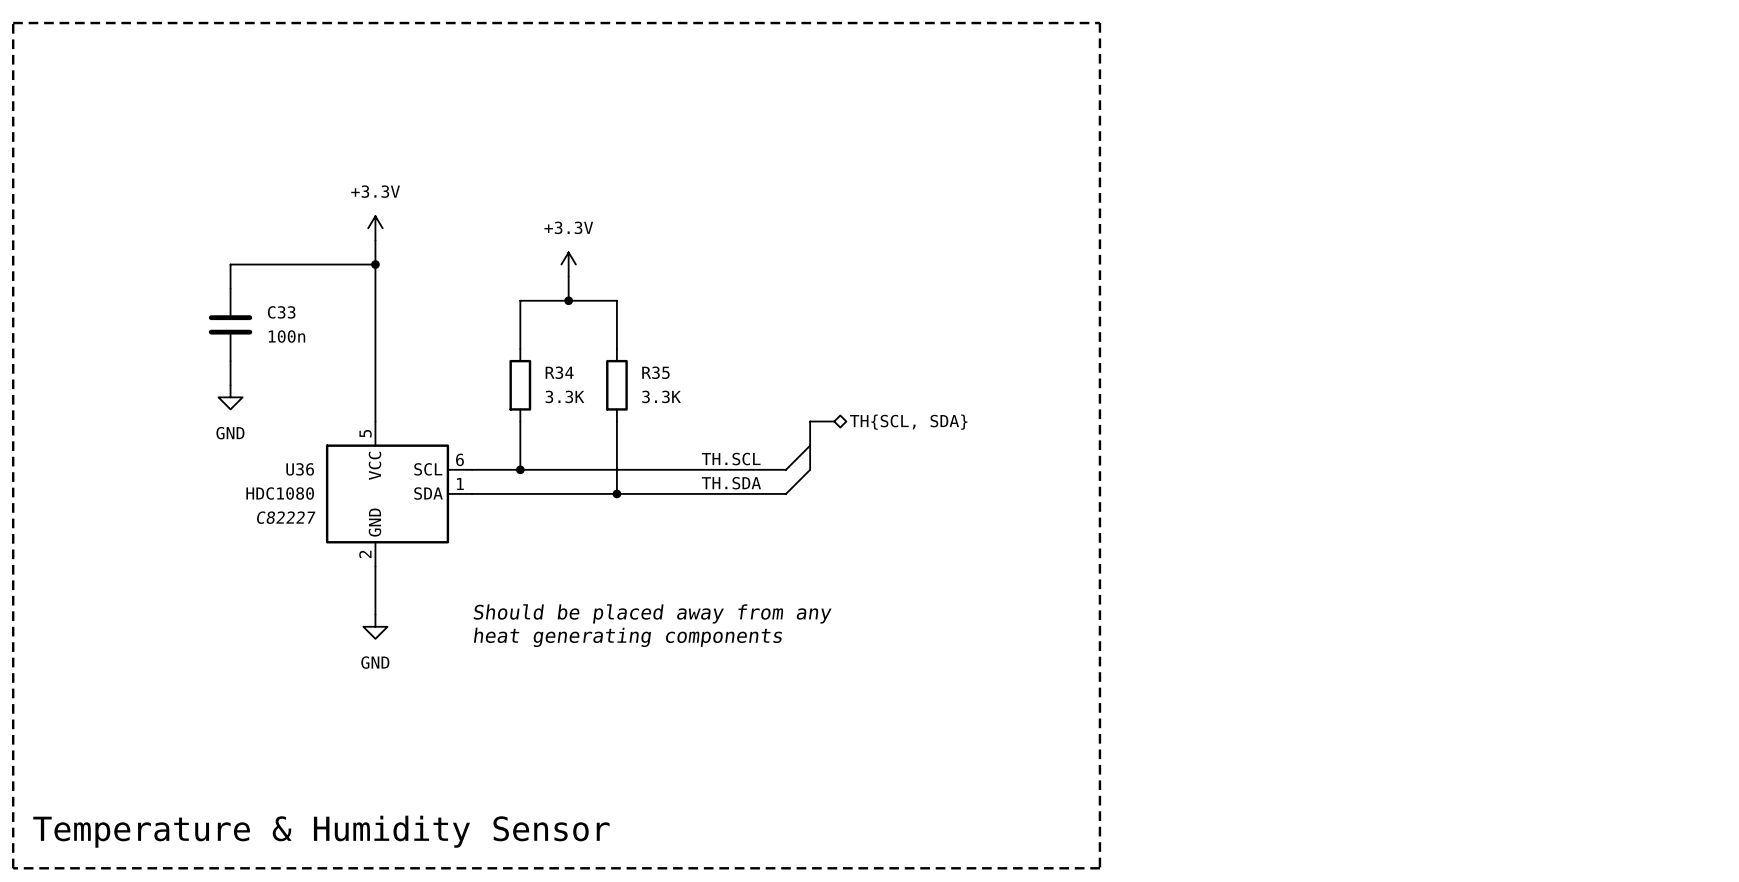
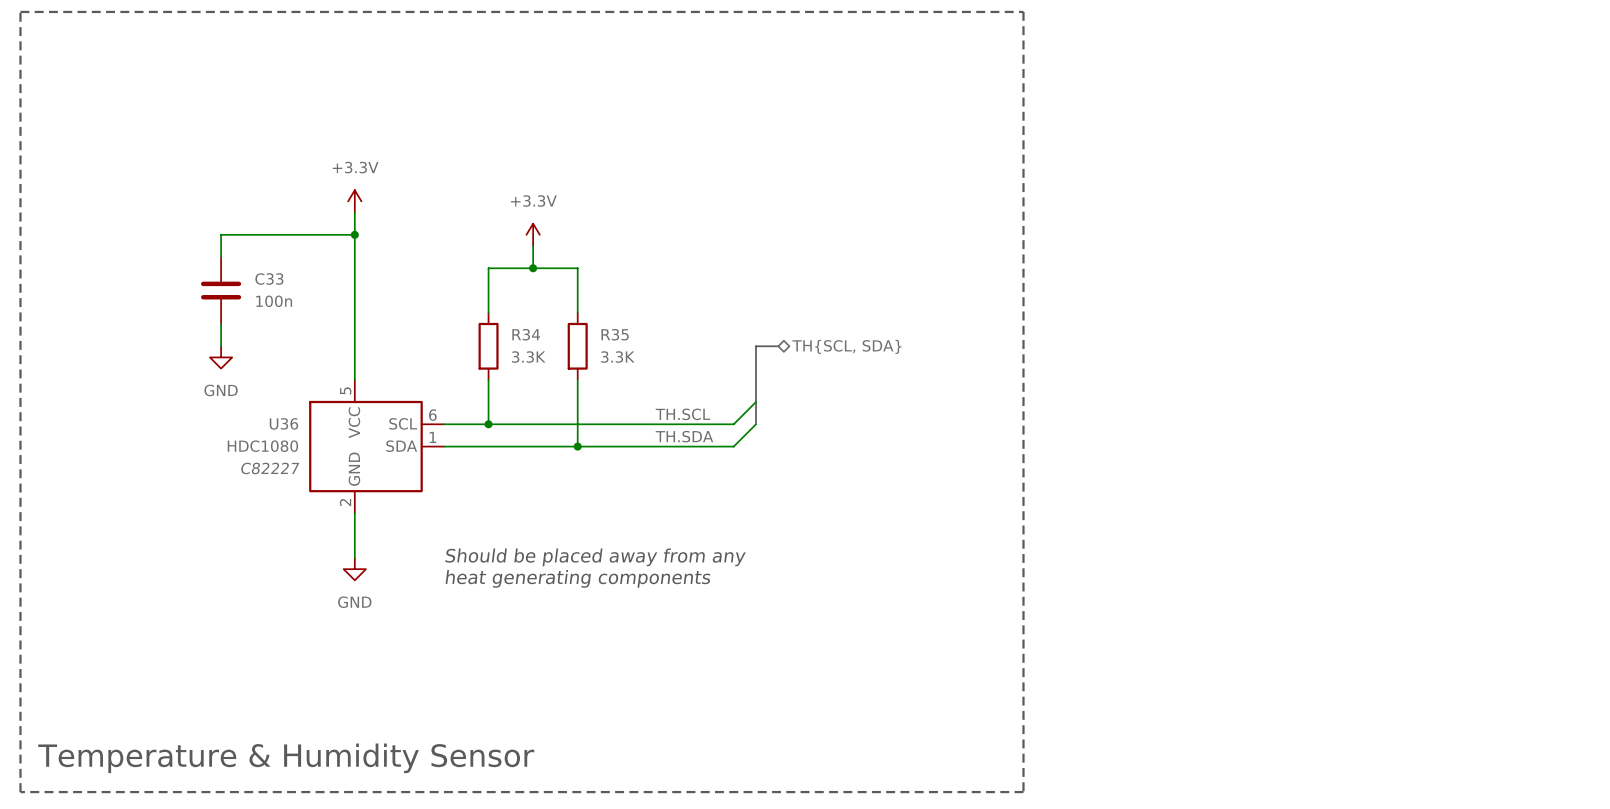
bus: (810, 421) (834, 421) -> (756, 379) (756, 346) (778, 346)
hierarchical label position: TH{SCL, SDA} (908, 422) -> TH{SCL, SDA} (846, 346)

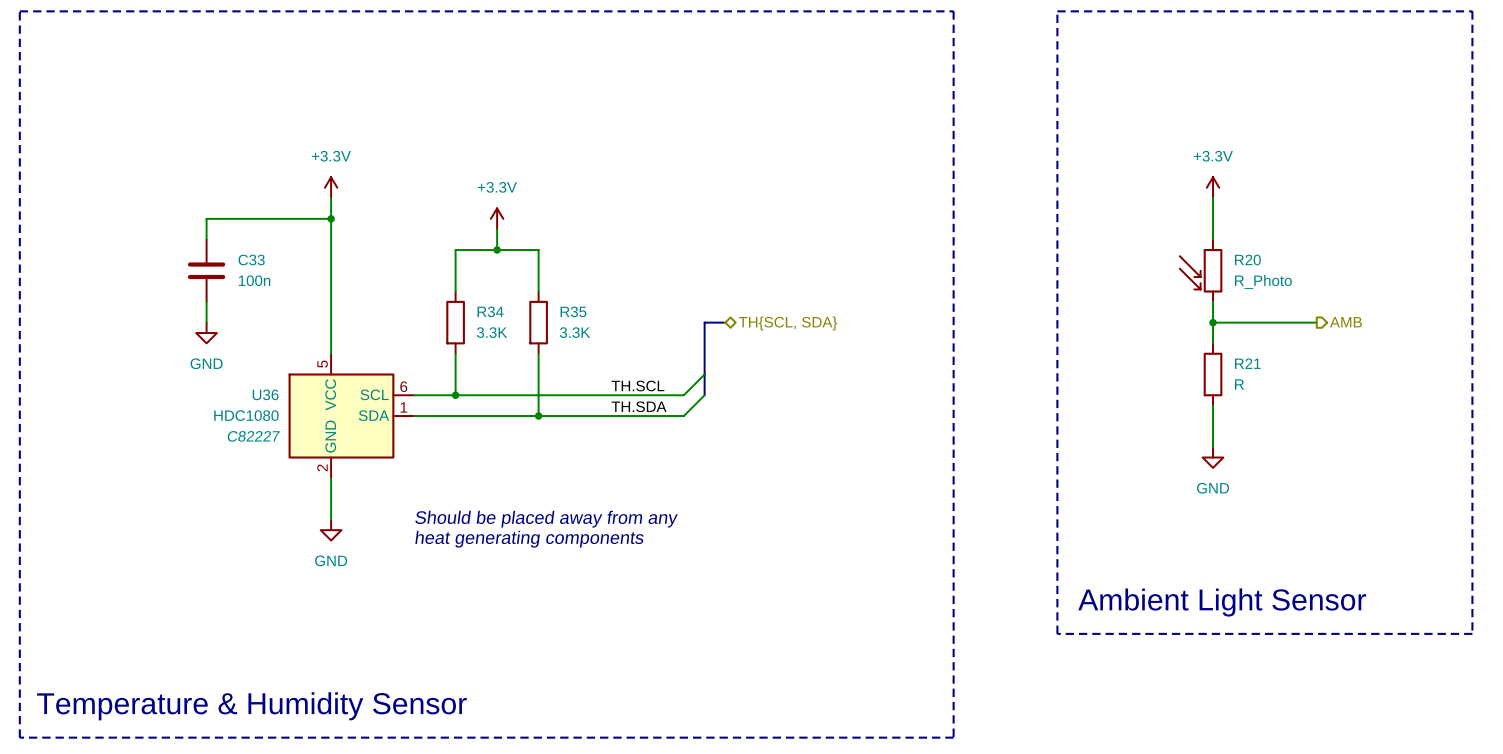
line: none -> (1057, 11) (1472, 11) (1472, 633) (1057, 633) (1057, 11)
power symbol: none -> +3.3V (1213, 187)
wire: none -> (1213, 198) (1213, 239)
R20: none -> R_Photo (1201, 270)
wire: none -> (1213, 301) (1213, 343)
hierarchical label: none -> AMB (1345, 322)
wire: none -> (1213, 322) (1316, 322)
junction: none -> (1213, 322)
R21: none -> R (1213, 374)
wire: none -> (1213, 405) (1213, 447)
power symbol: none -> GND (1213, 457)
text: none -> Ambient Light Sensor (1222, 602)

